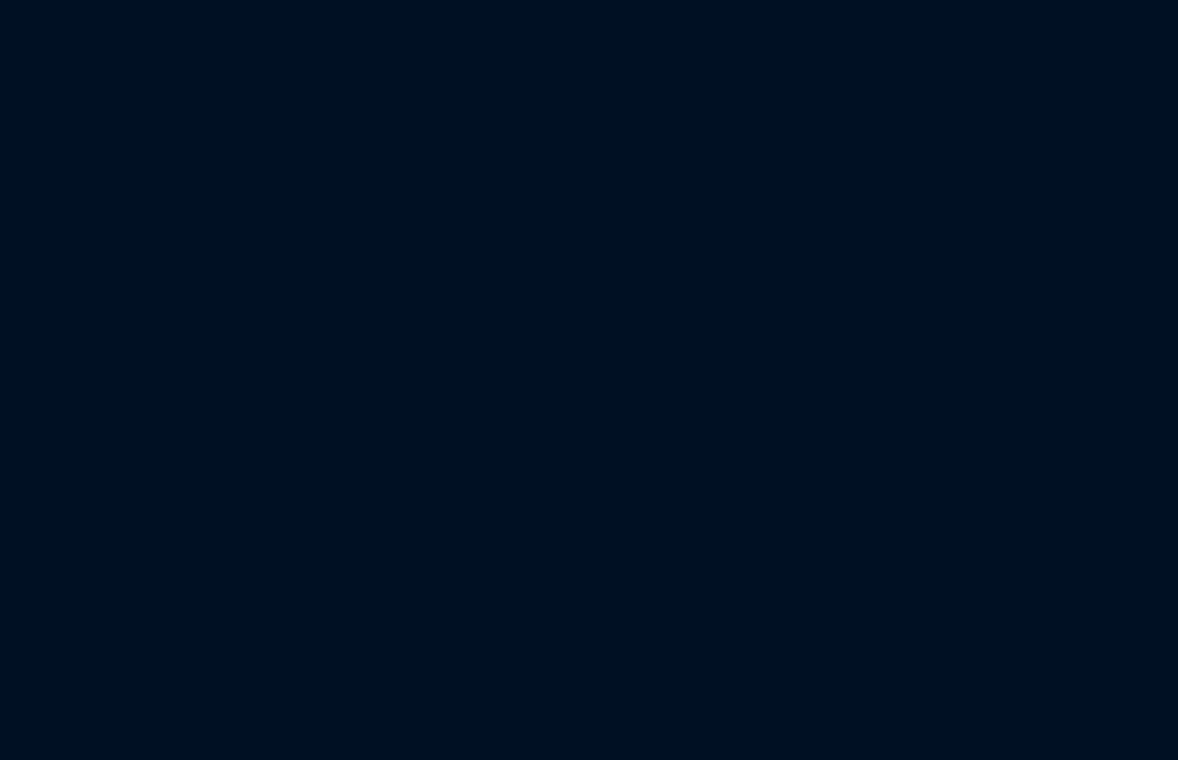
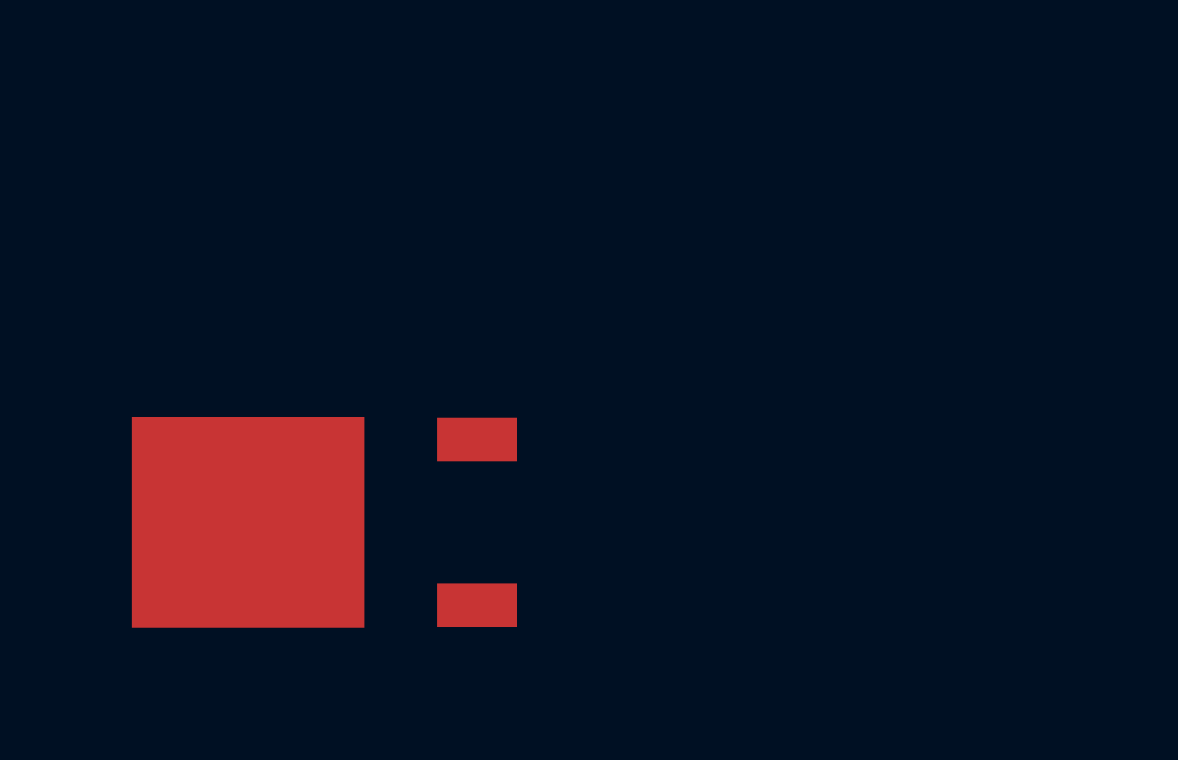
part: none -> (324, 522)

